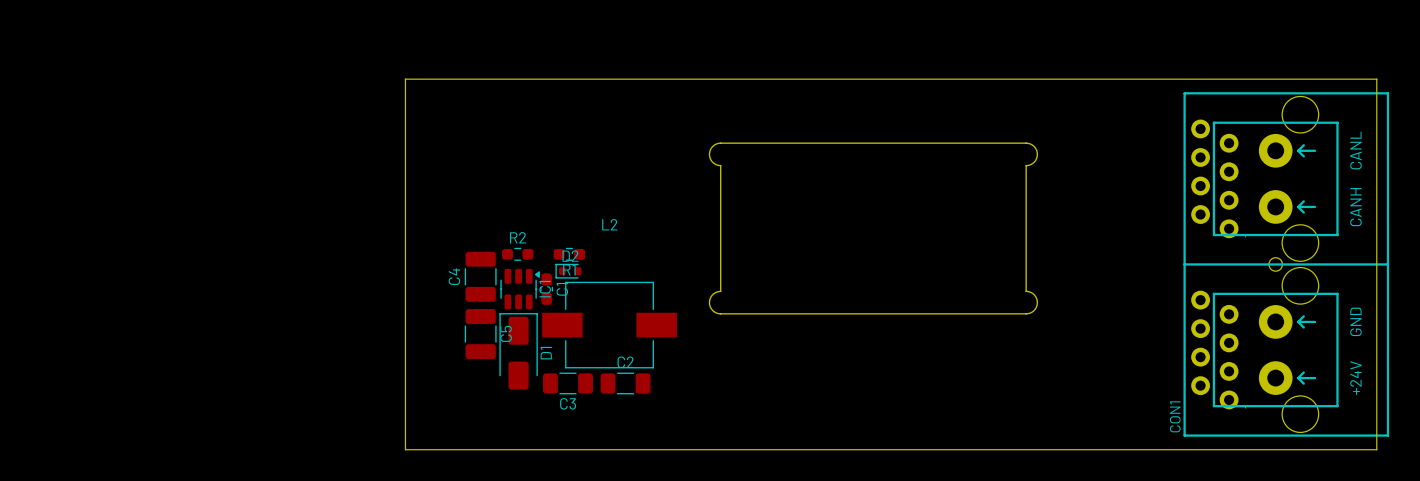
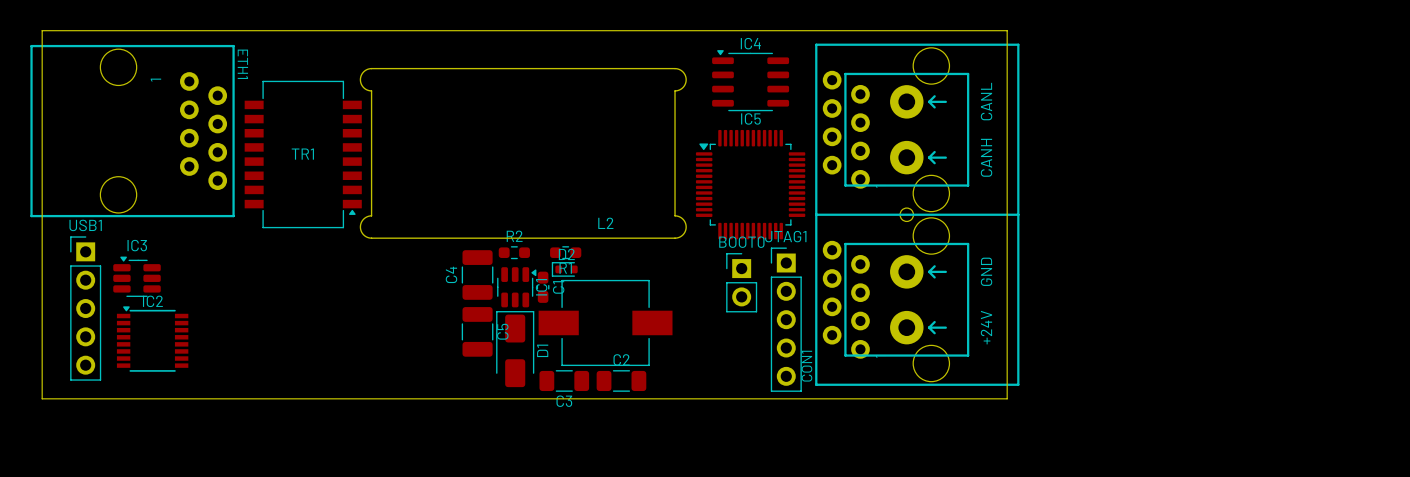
board edge: none -> (42, 30) (1007, 30) (1007, 398) (42, 398) (42, 30)
board edge: (405, 79) (1376, 79) (1376, 449) (405, 449) (405, 79) -> none
IC4: none -> (750, 80)
ETH1: none -> (132, 131)
part: none -> (523, 153)
TR1: none -> (303, 154)
IC5: none -> (750, 184)
part: (873, 228) -> none
CON1 position: (1286, 264) -> (917, 214)
IC3: none -> (137, 276)
BOOT0: none -> (741, 282)
USB1: none -> (85, 308)
JTAG1: none -> (786, 319)
IC2: none -> (152, 339)

